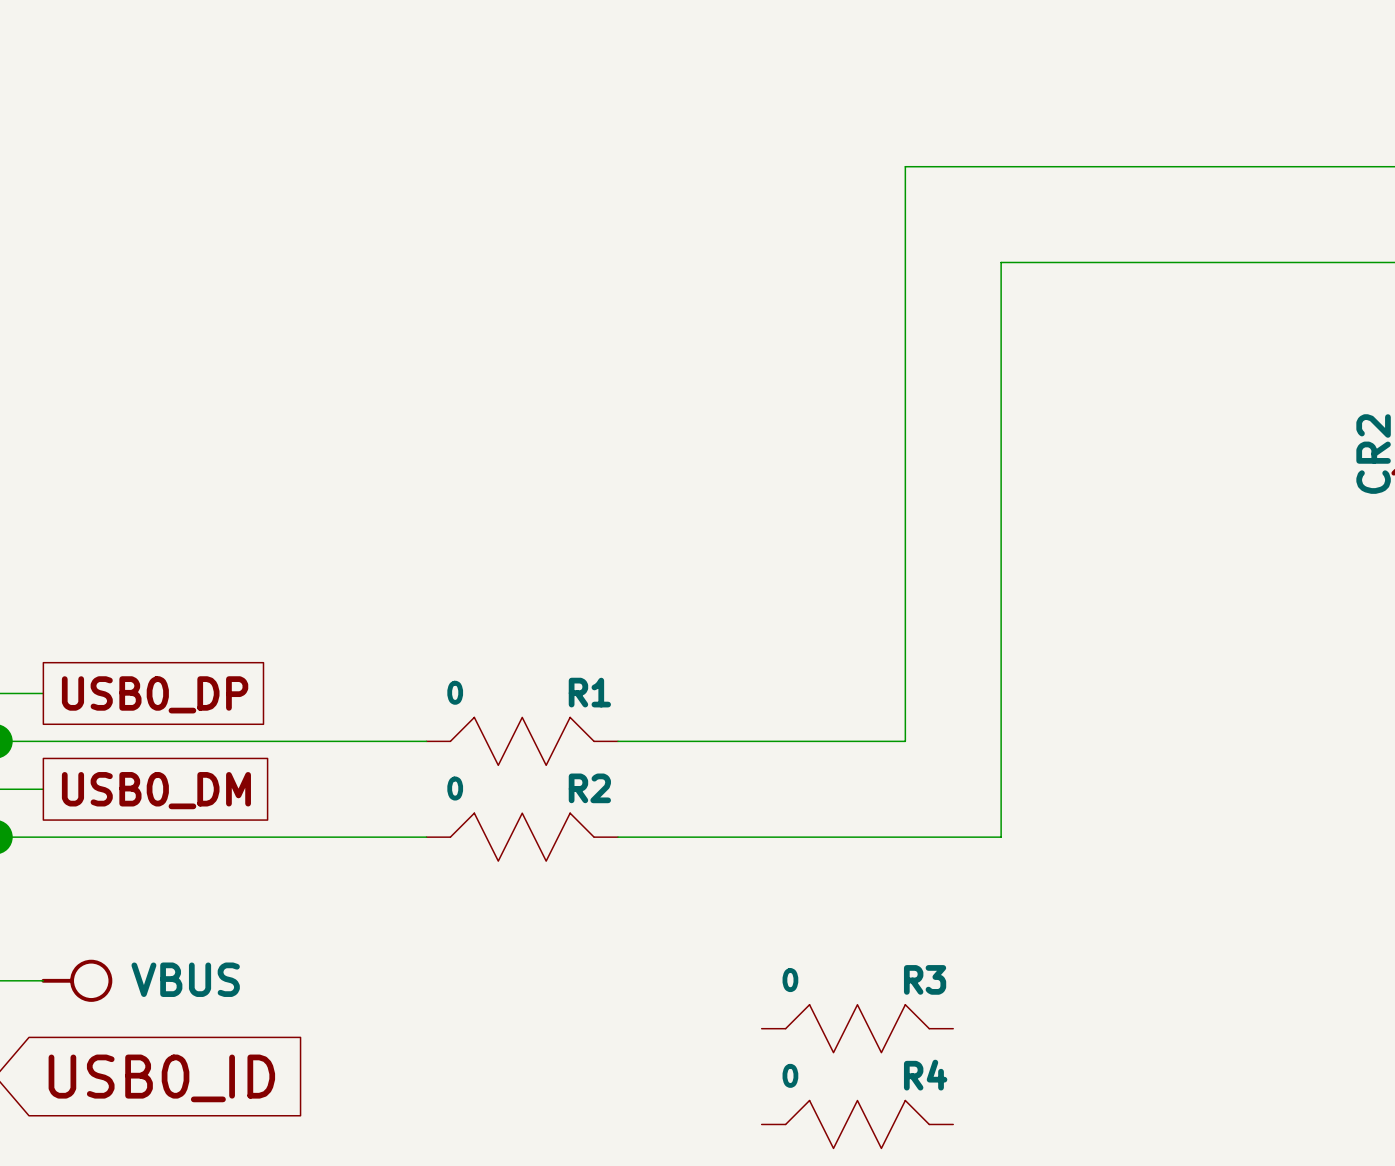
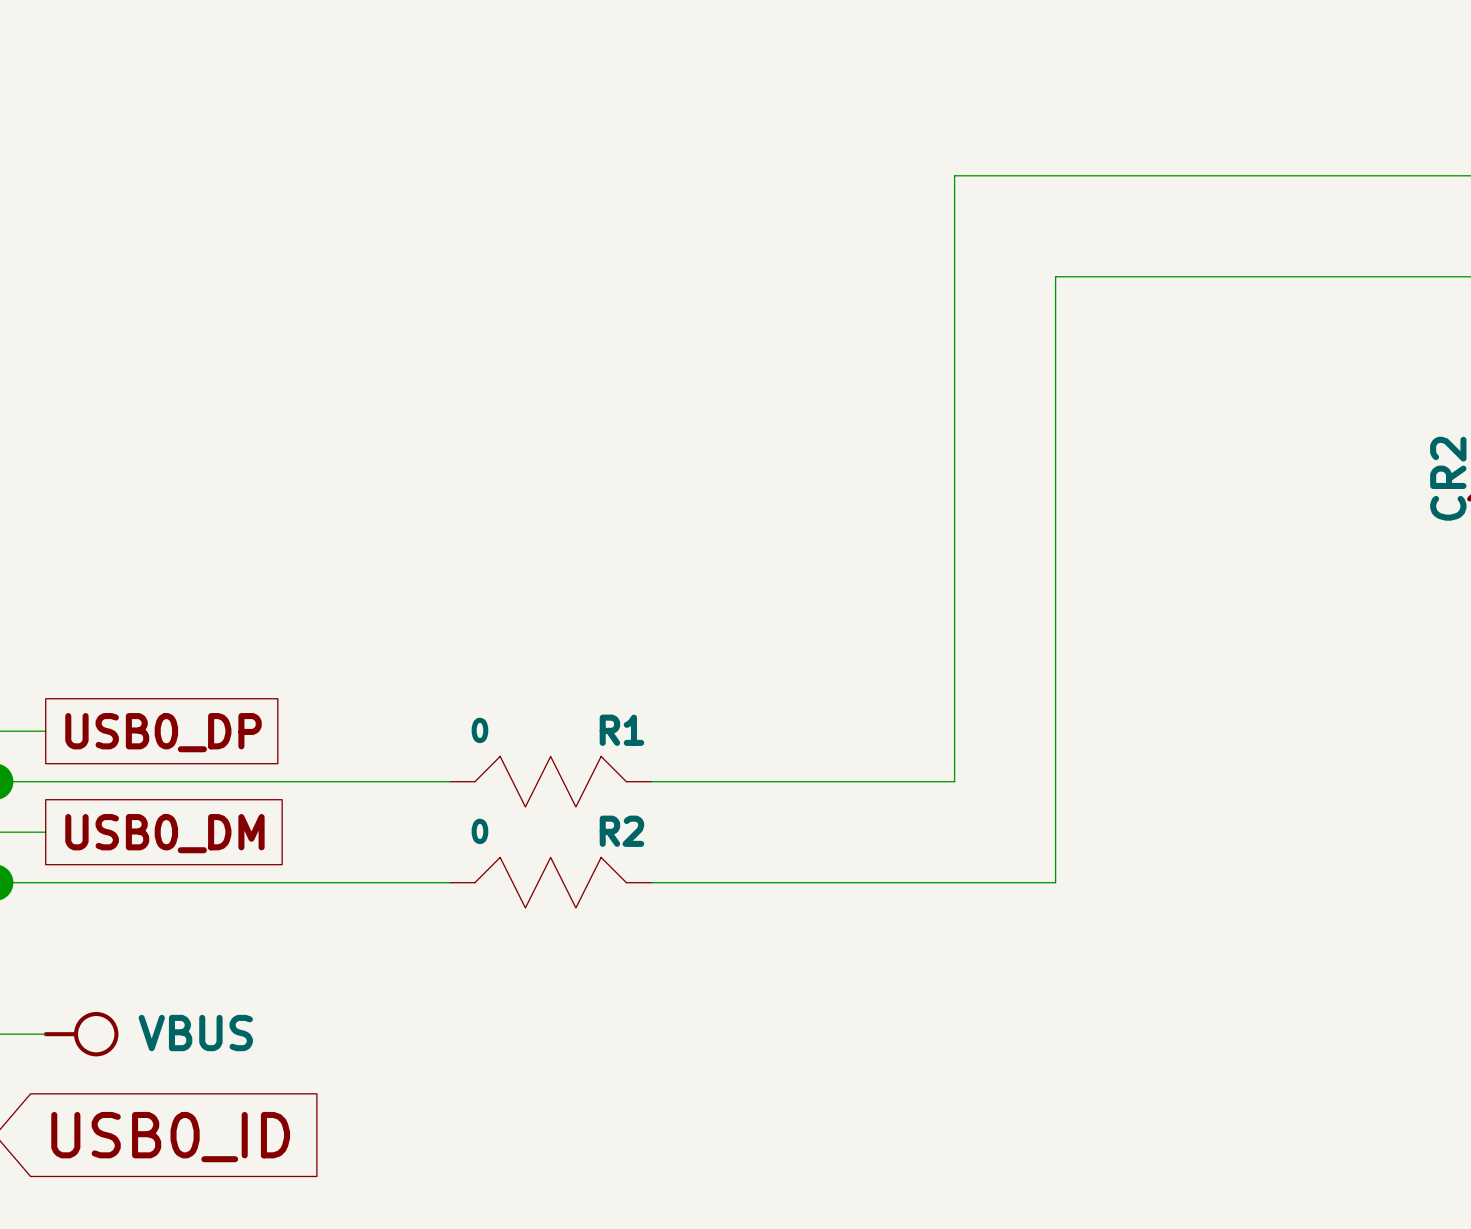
R3: 0 (857, 1028) -> none
R4: 0 (857, 1124) -> none

